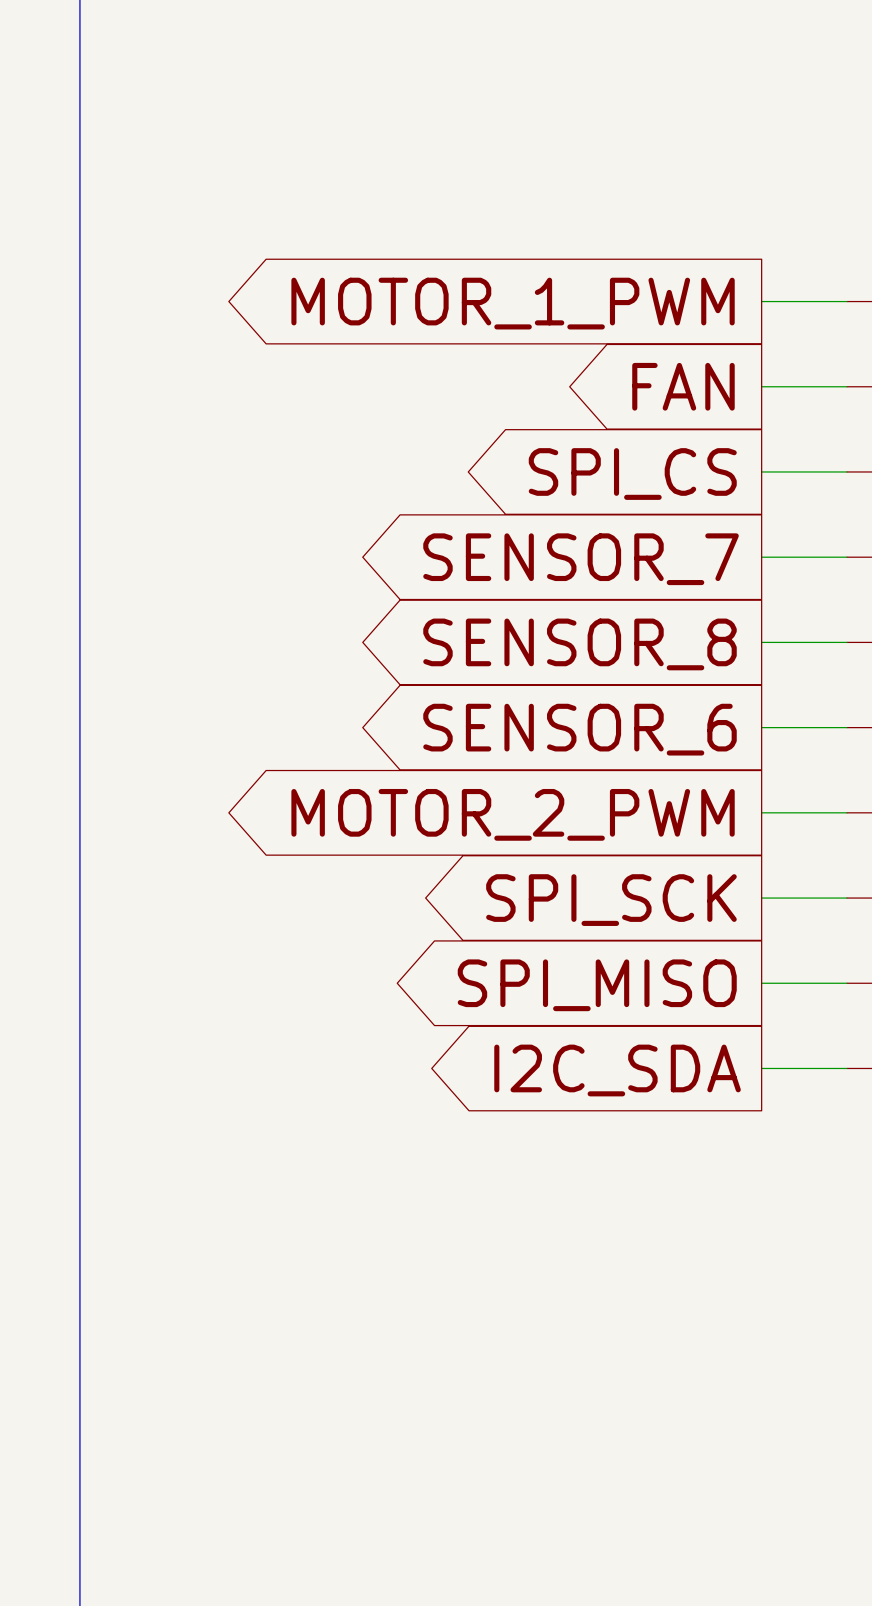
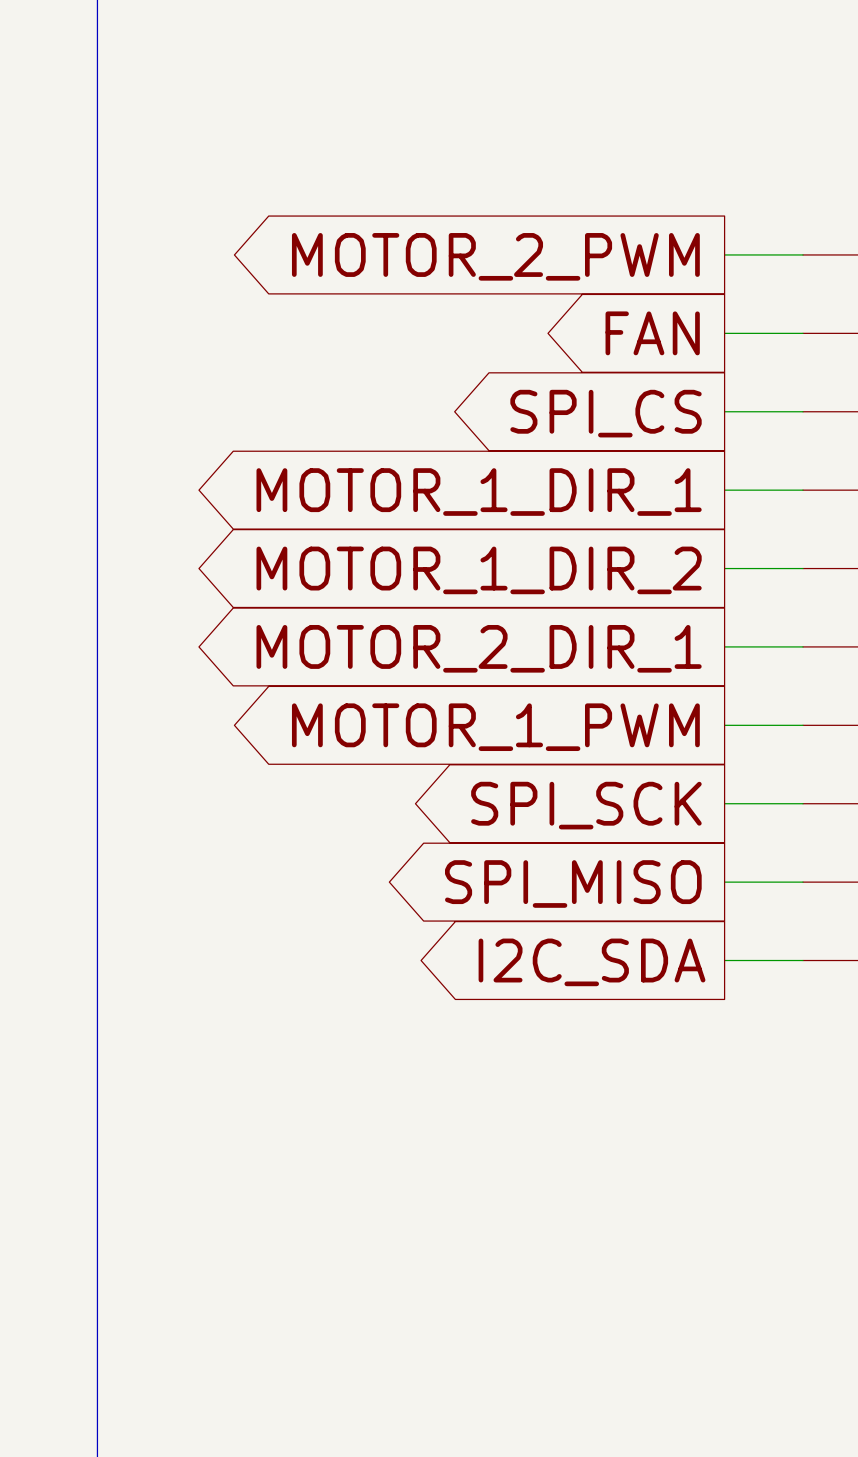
global label: MOTOR_1_PWM (513, 303) -> MOTOR_2_PWM (495, 256)
global label: SENSOR_7 (581, 559) -> MOTOR_1_DIR_1 (479, 492)
global label: SENSOR_8 (580, 644) -> MOTOR_1_DIR_2 (479, 570)
global label: SENSOR_6 (580, 729) -> MOTOR_2_DIR_1 (479, 648)
global label: MOTOR_2_PWM (513, 814) -> MOTOR_1_PWM (495, 727)

